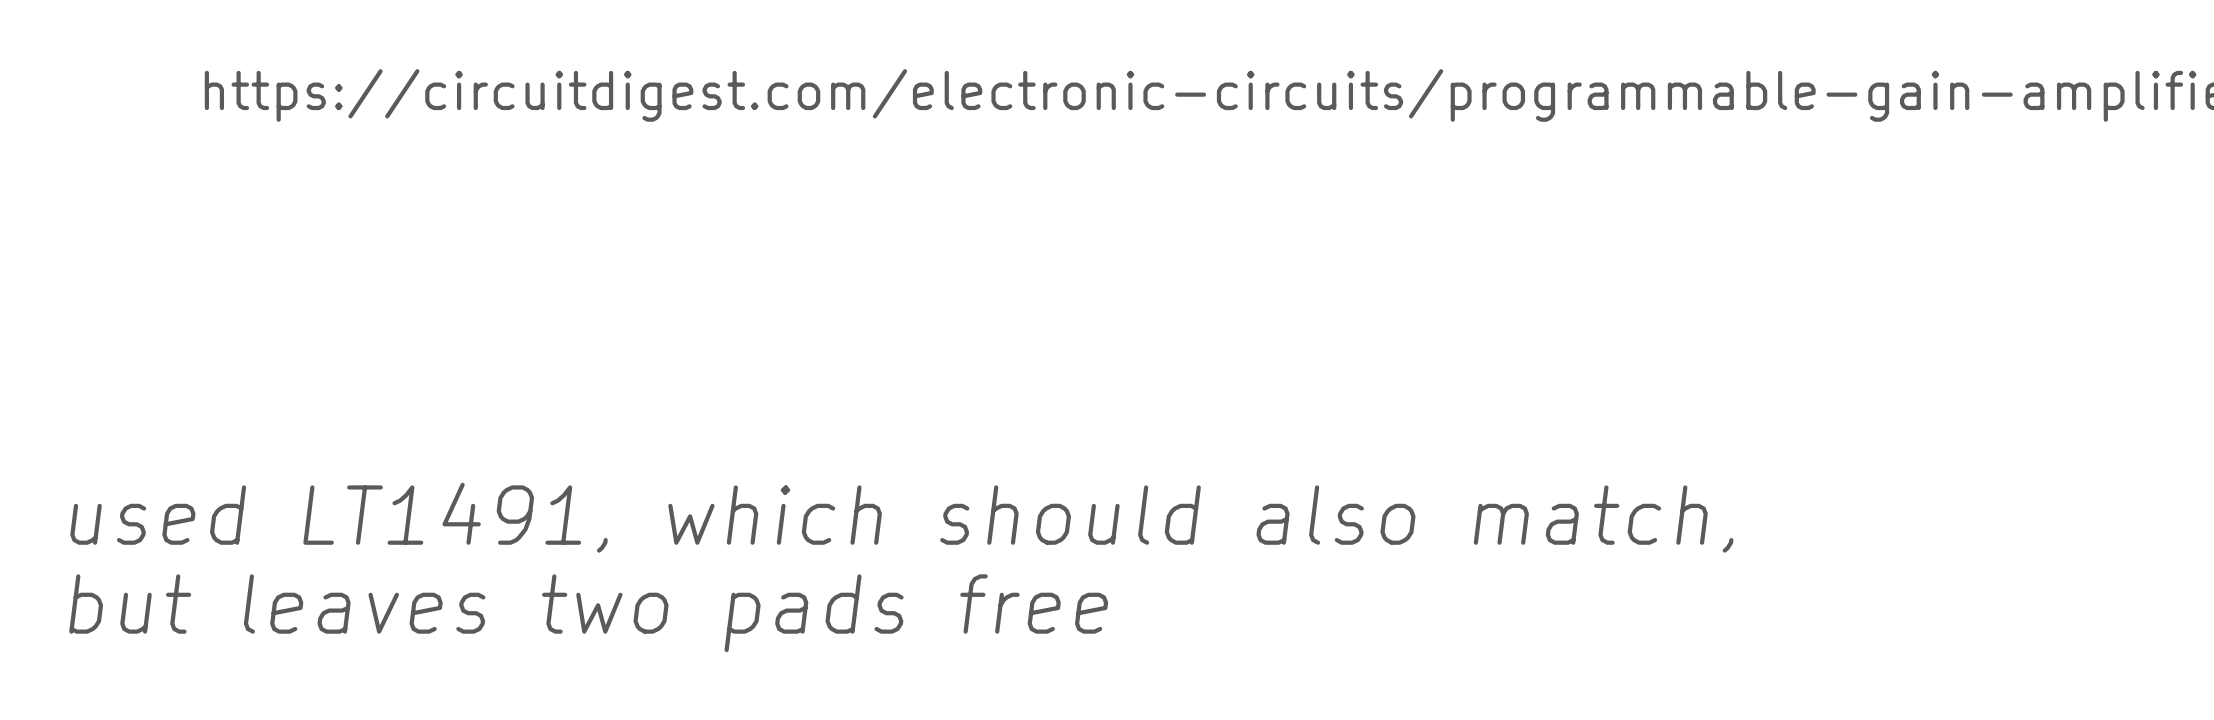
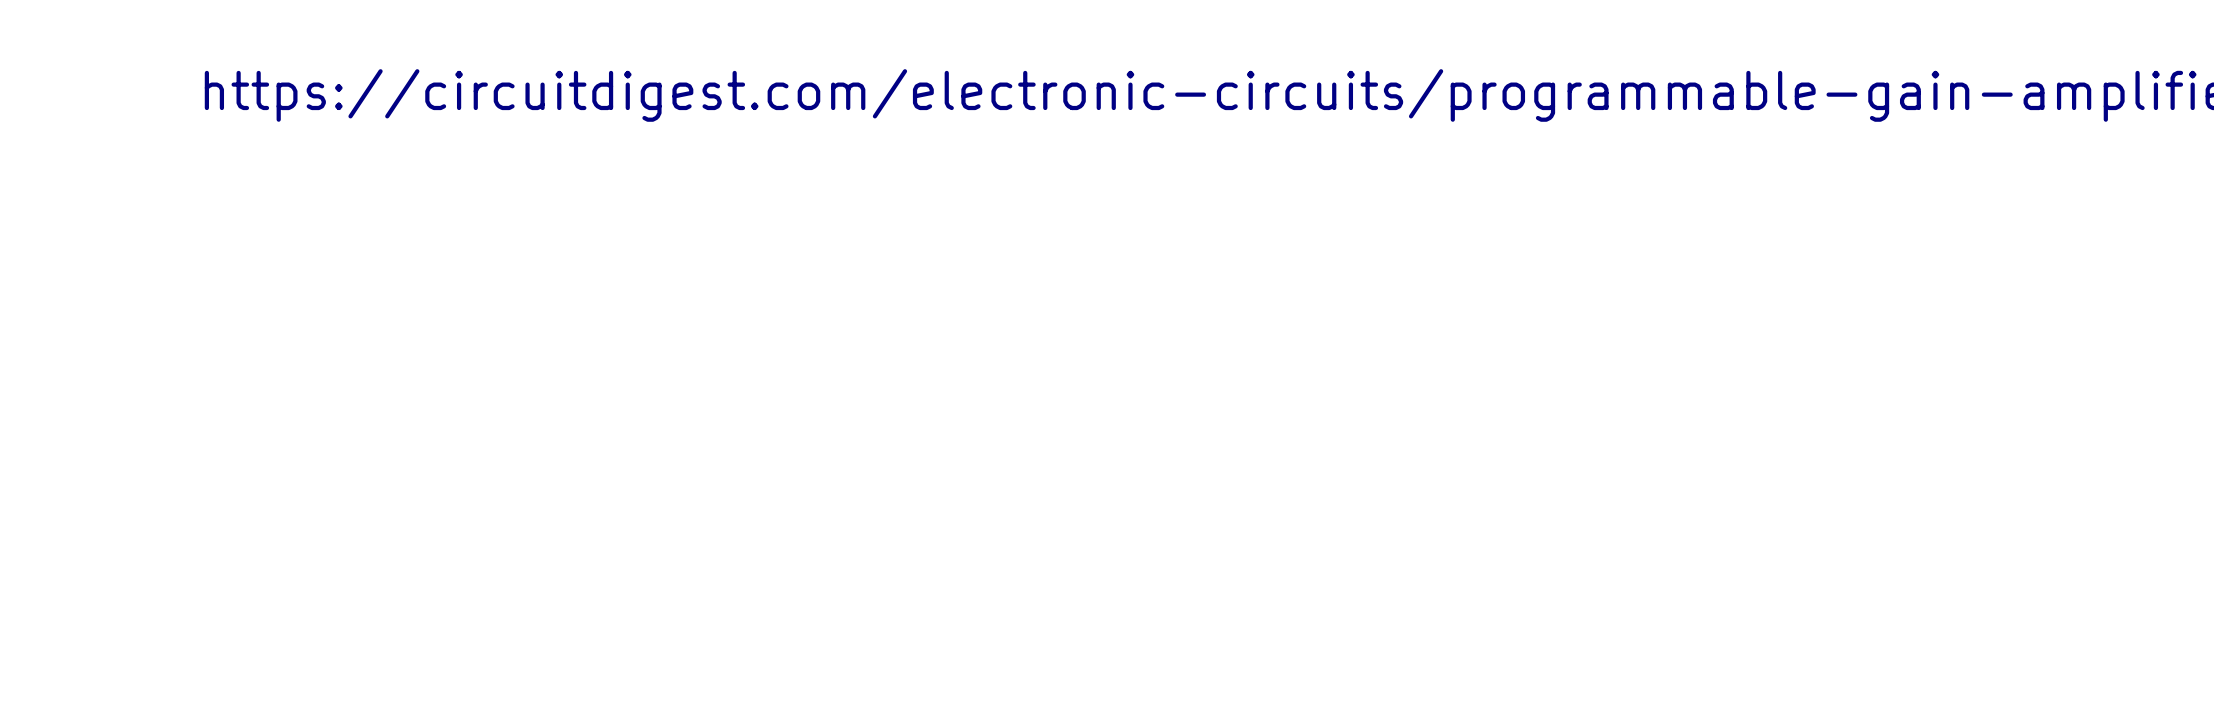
text: used LT1491, which should also match, (901, 517) -> none
text: but leaves two pads free (588, 613) -> none

